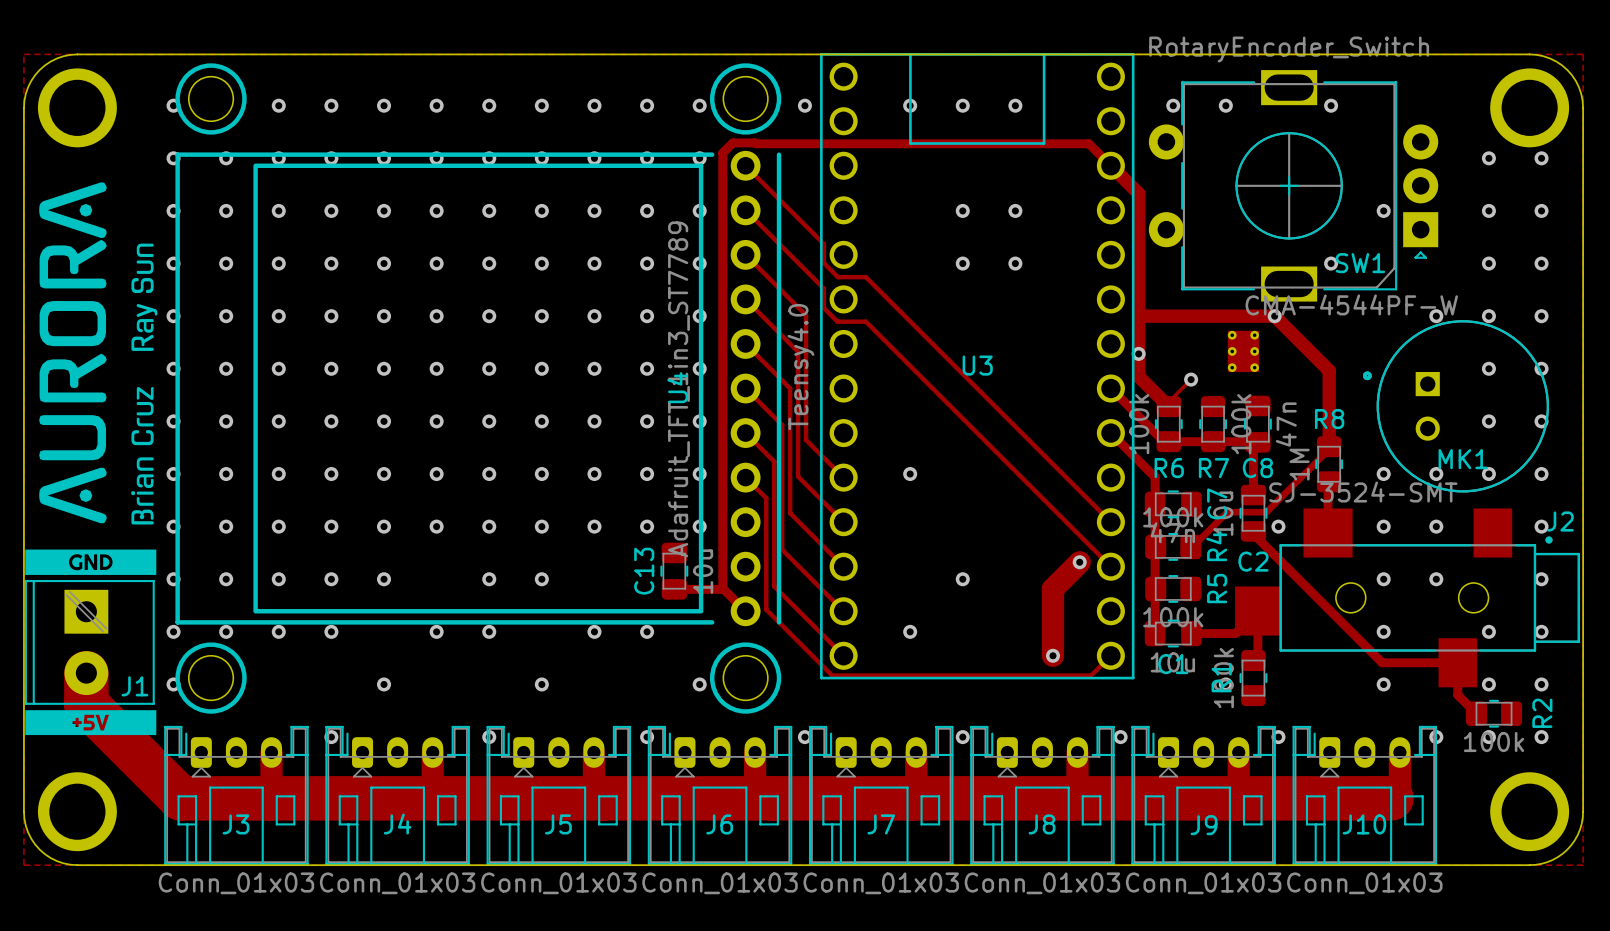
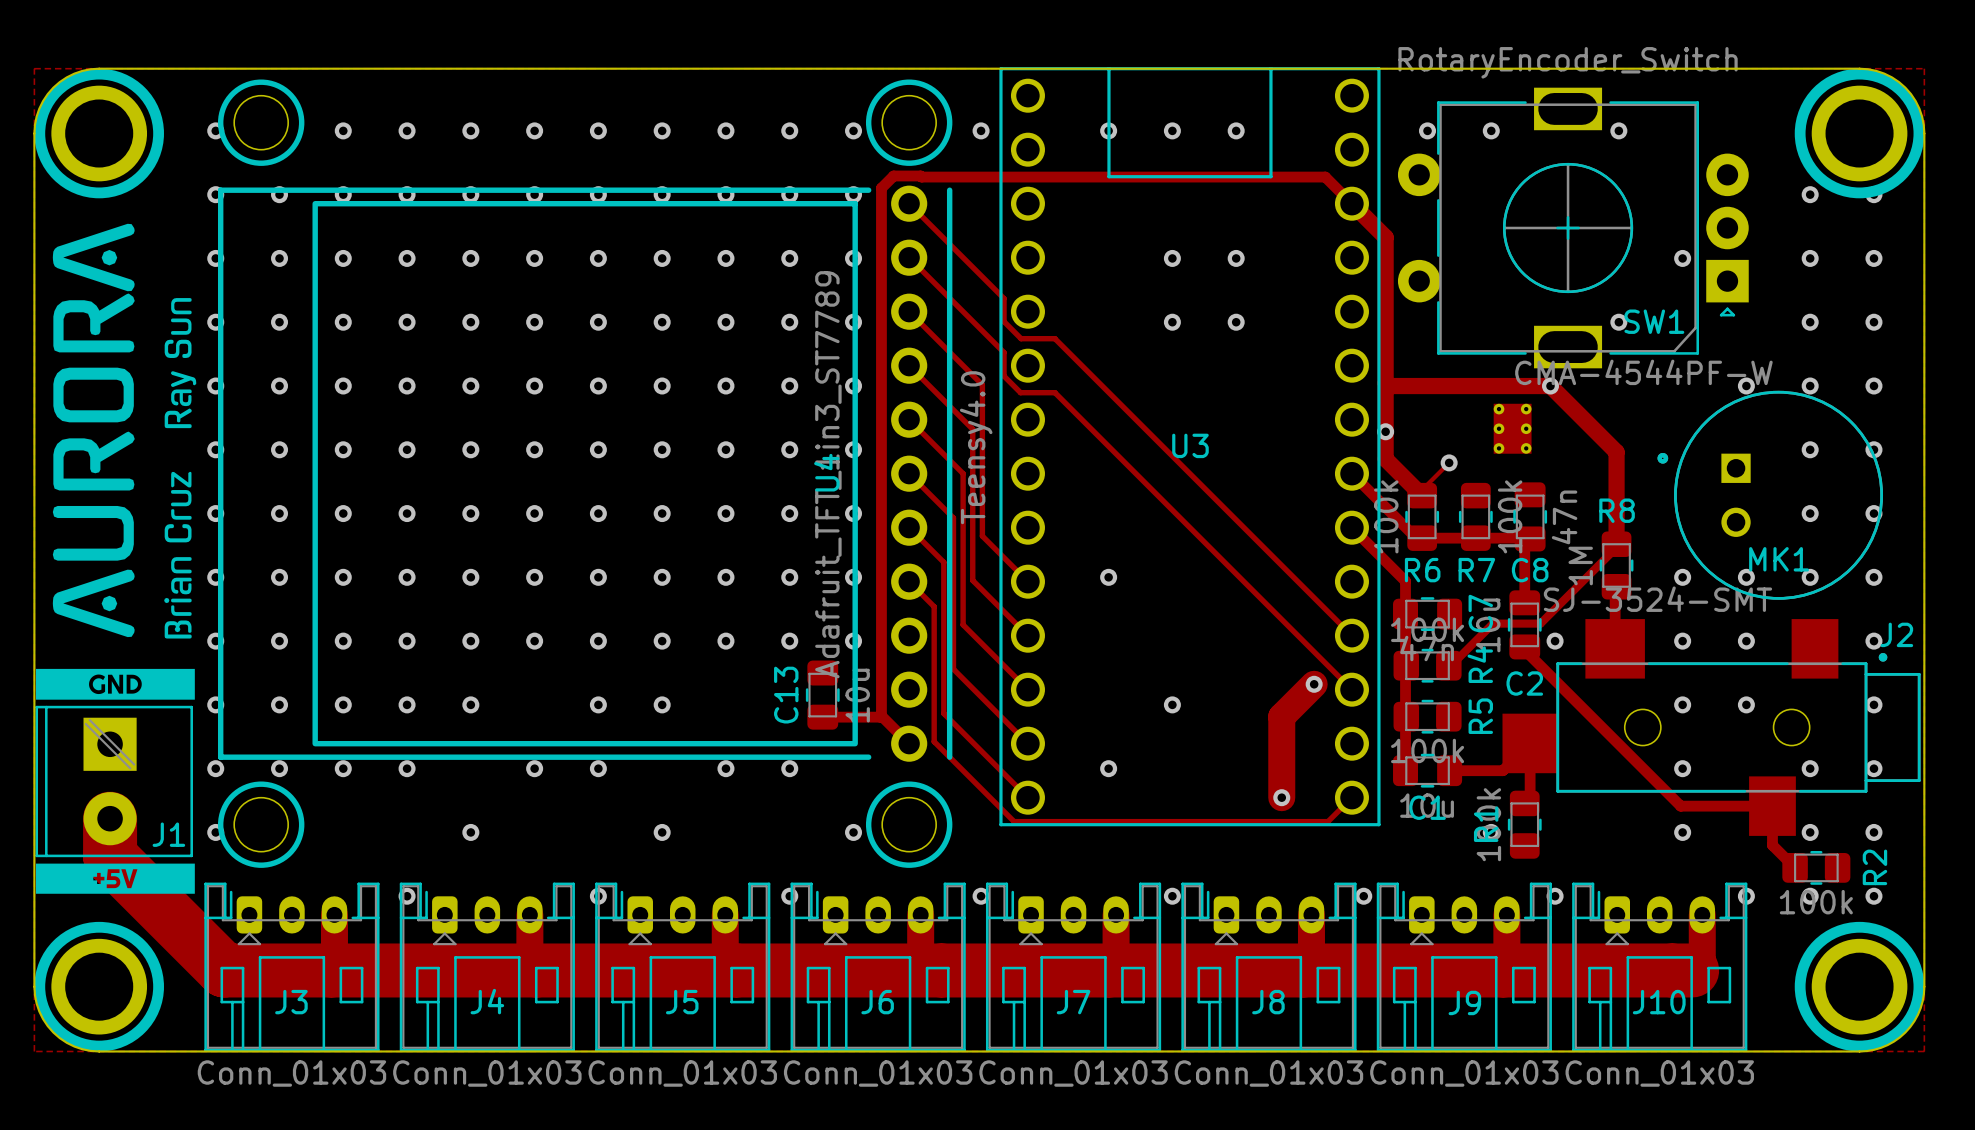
drawing: none -> [34, 68, 164, 199]
drawing: none -> [1794, 68, 1925, 199]
drawing: none -> [34, 921, 164, 1052]
drawing: none -> [1794, 921, 1925, 1052]

